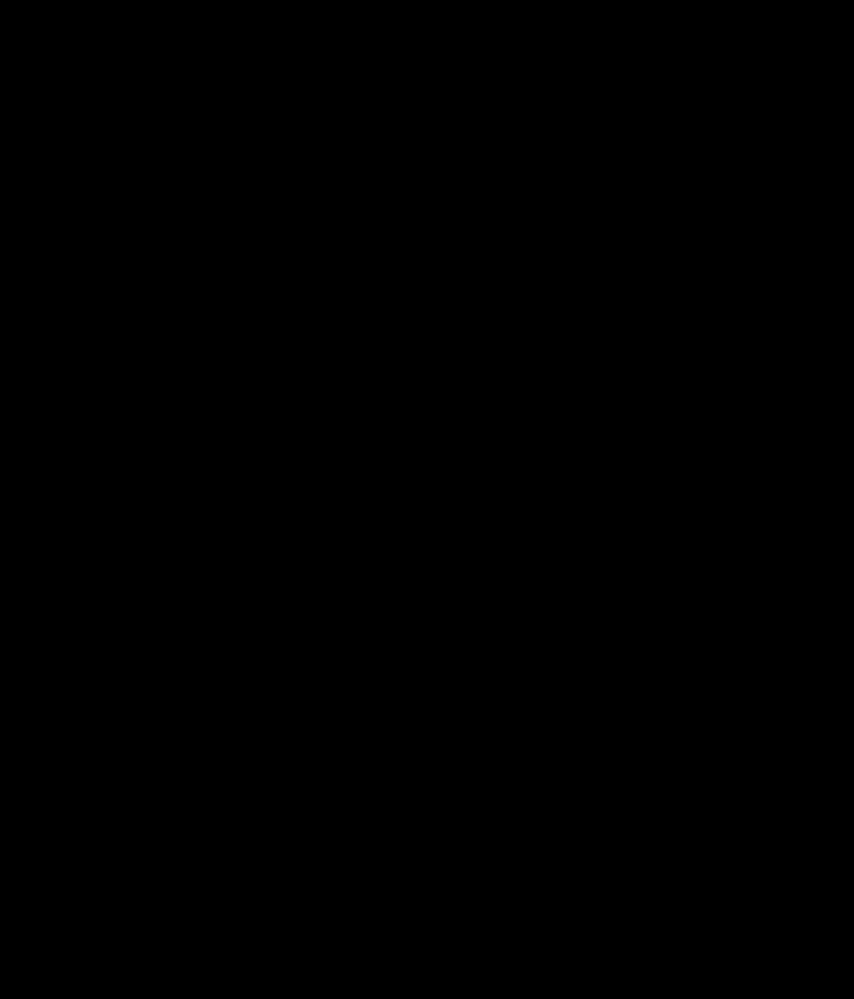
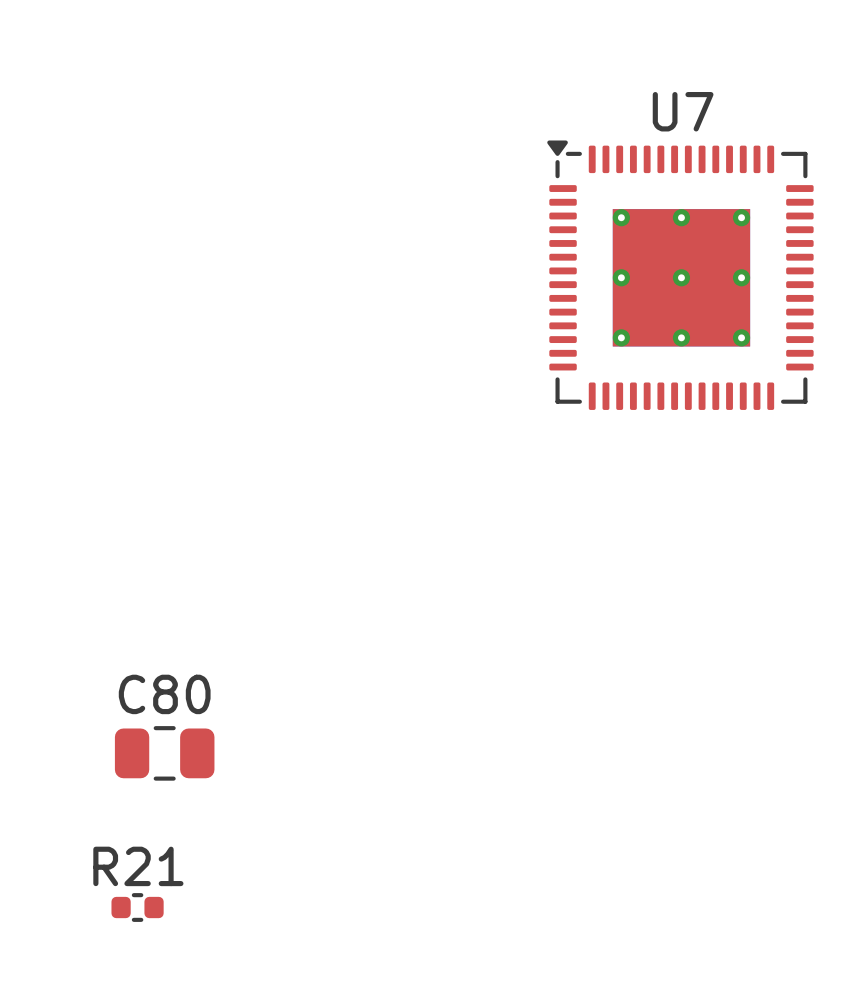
U7: none -> (680, 275)
C80: none -> (164, 753)
R21: none -> (137, 907)

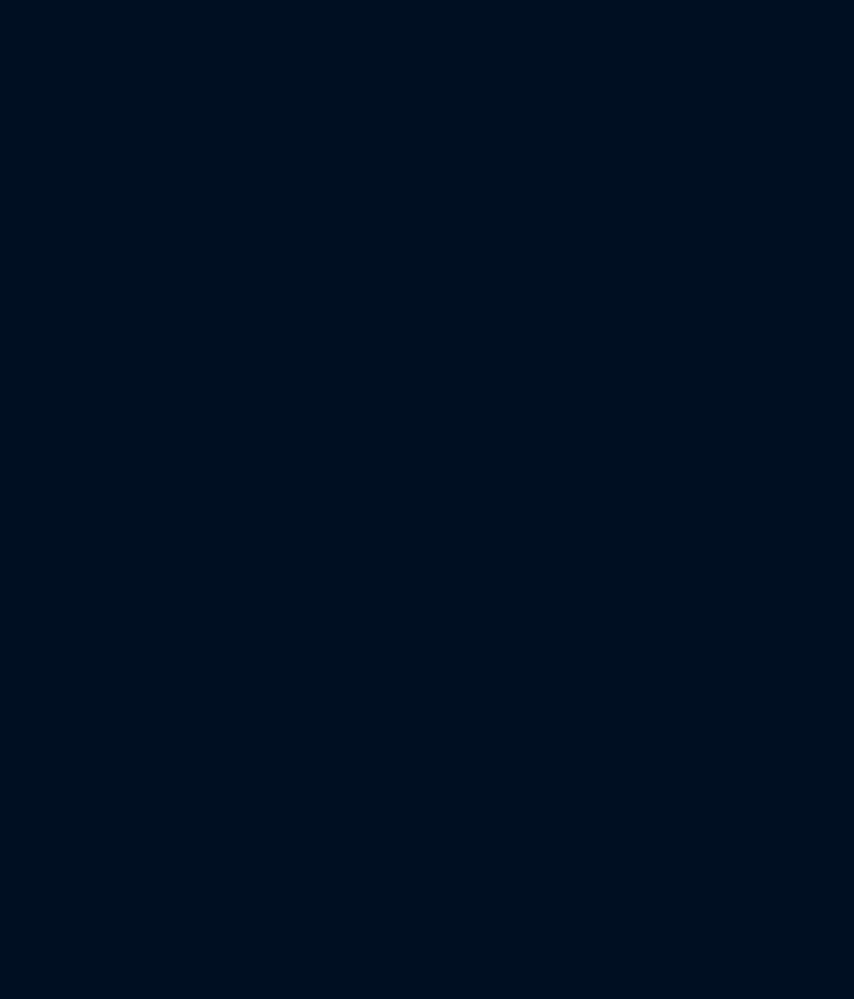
U7: (680, 275) -> none
C80: (164, 753) -> none
R21: (137, 907) -> none

